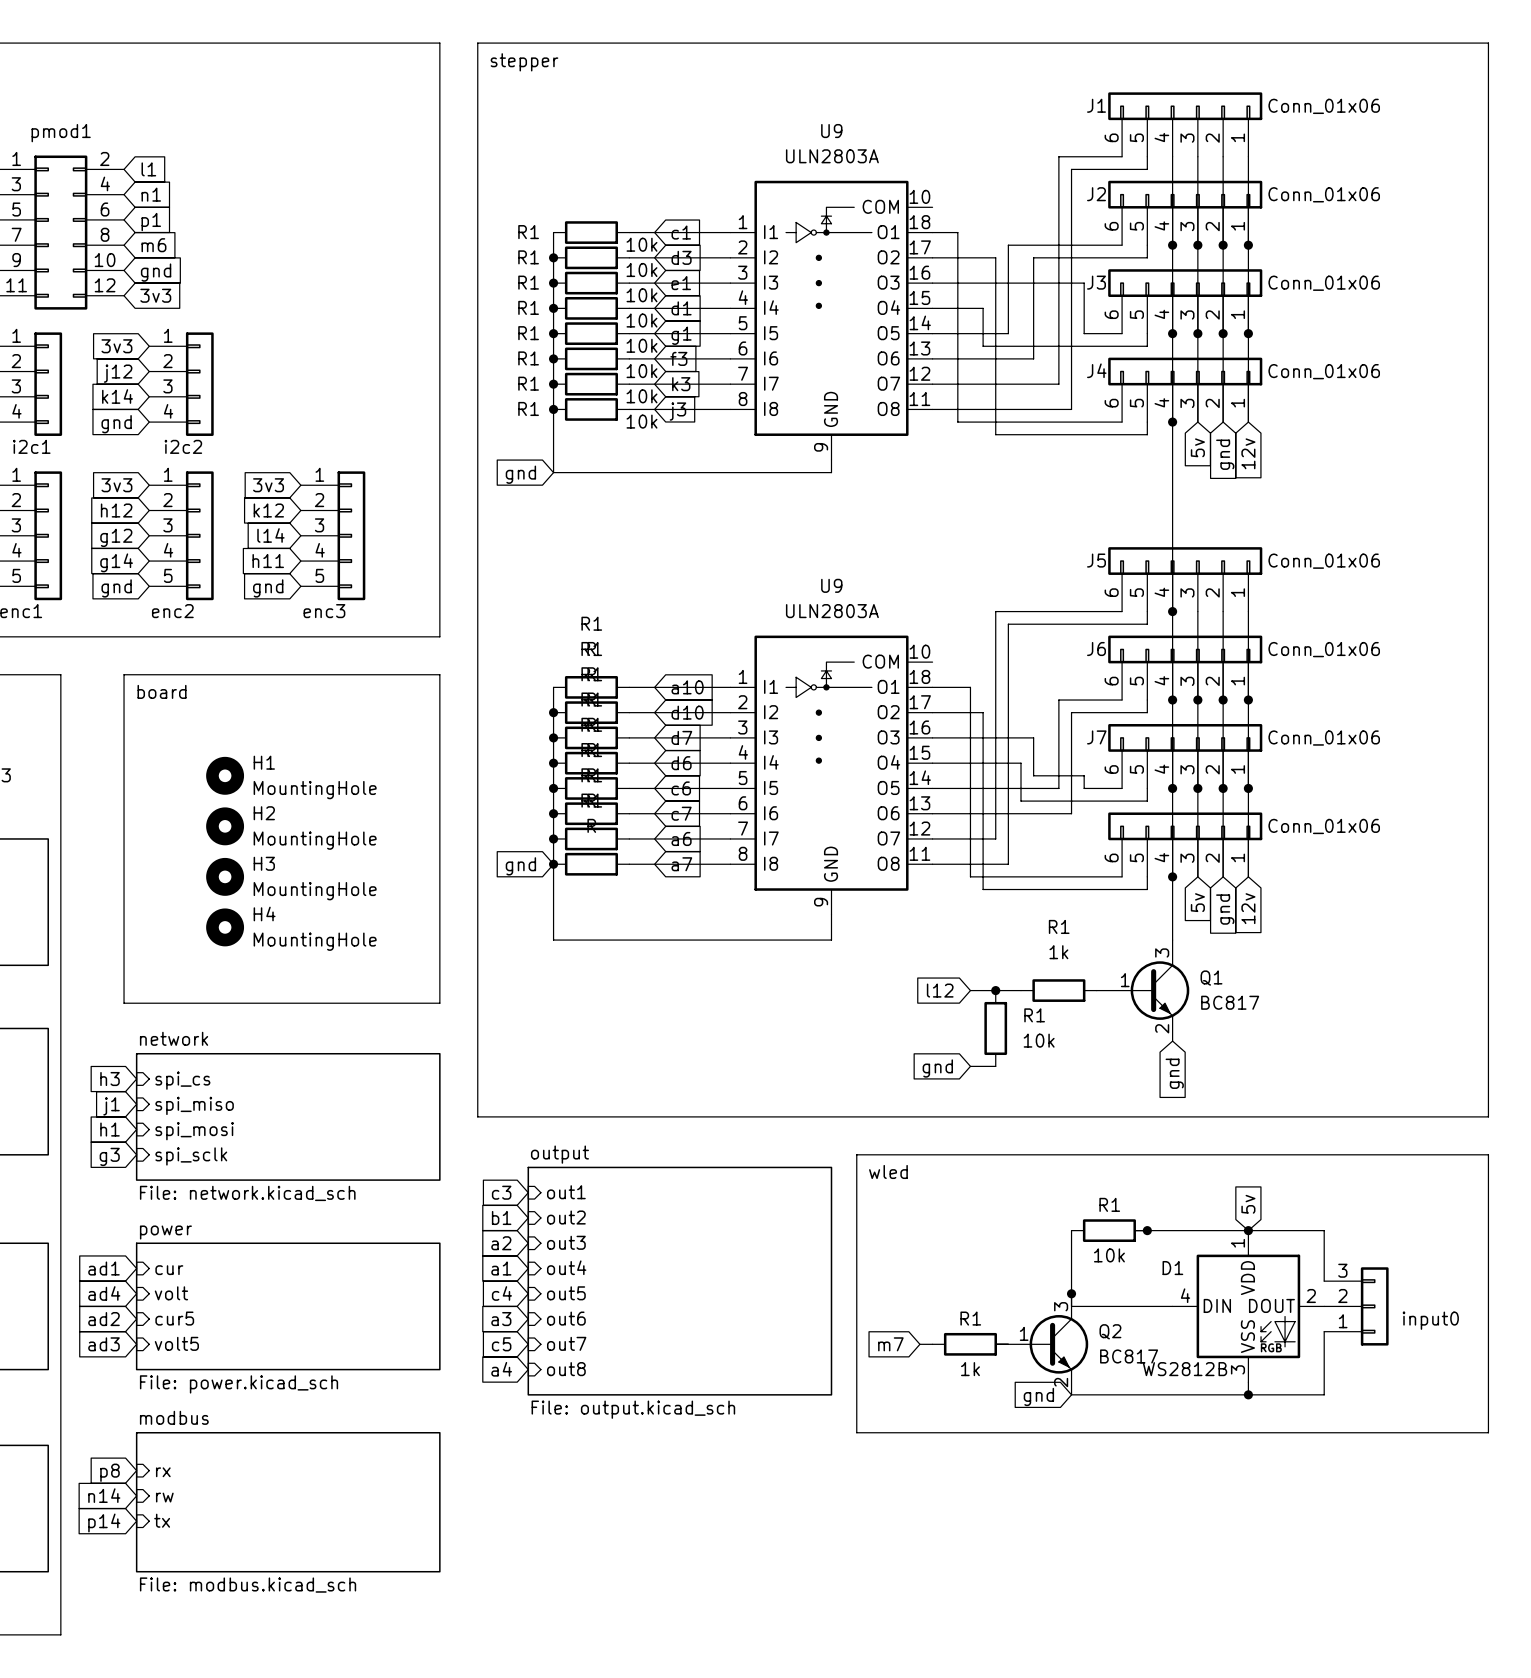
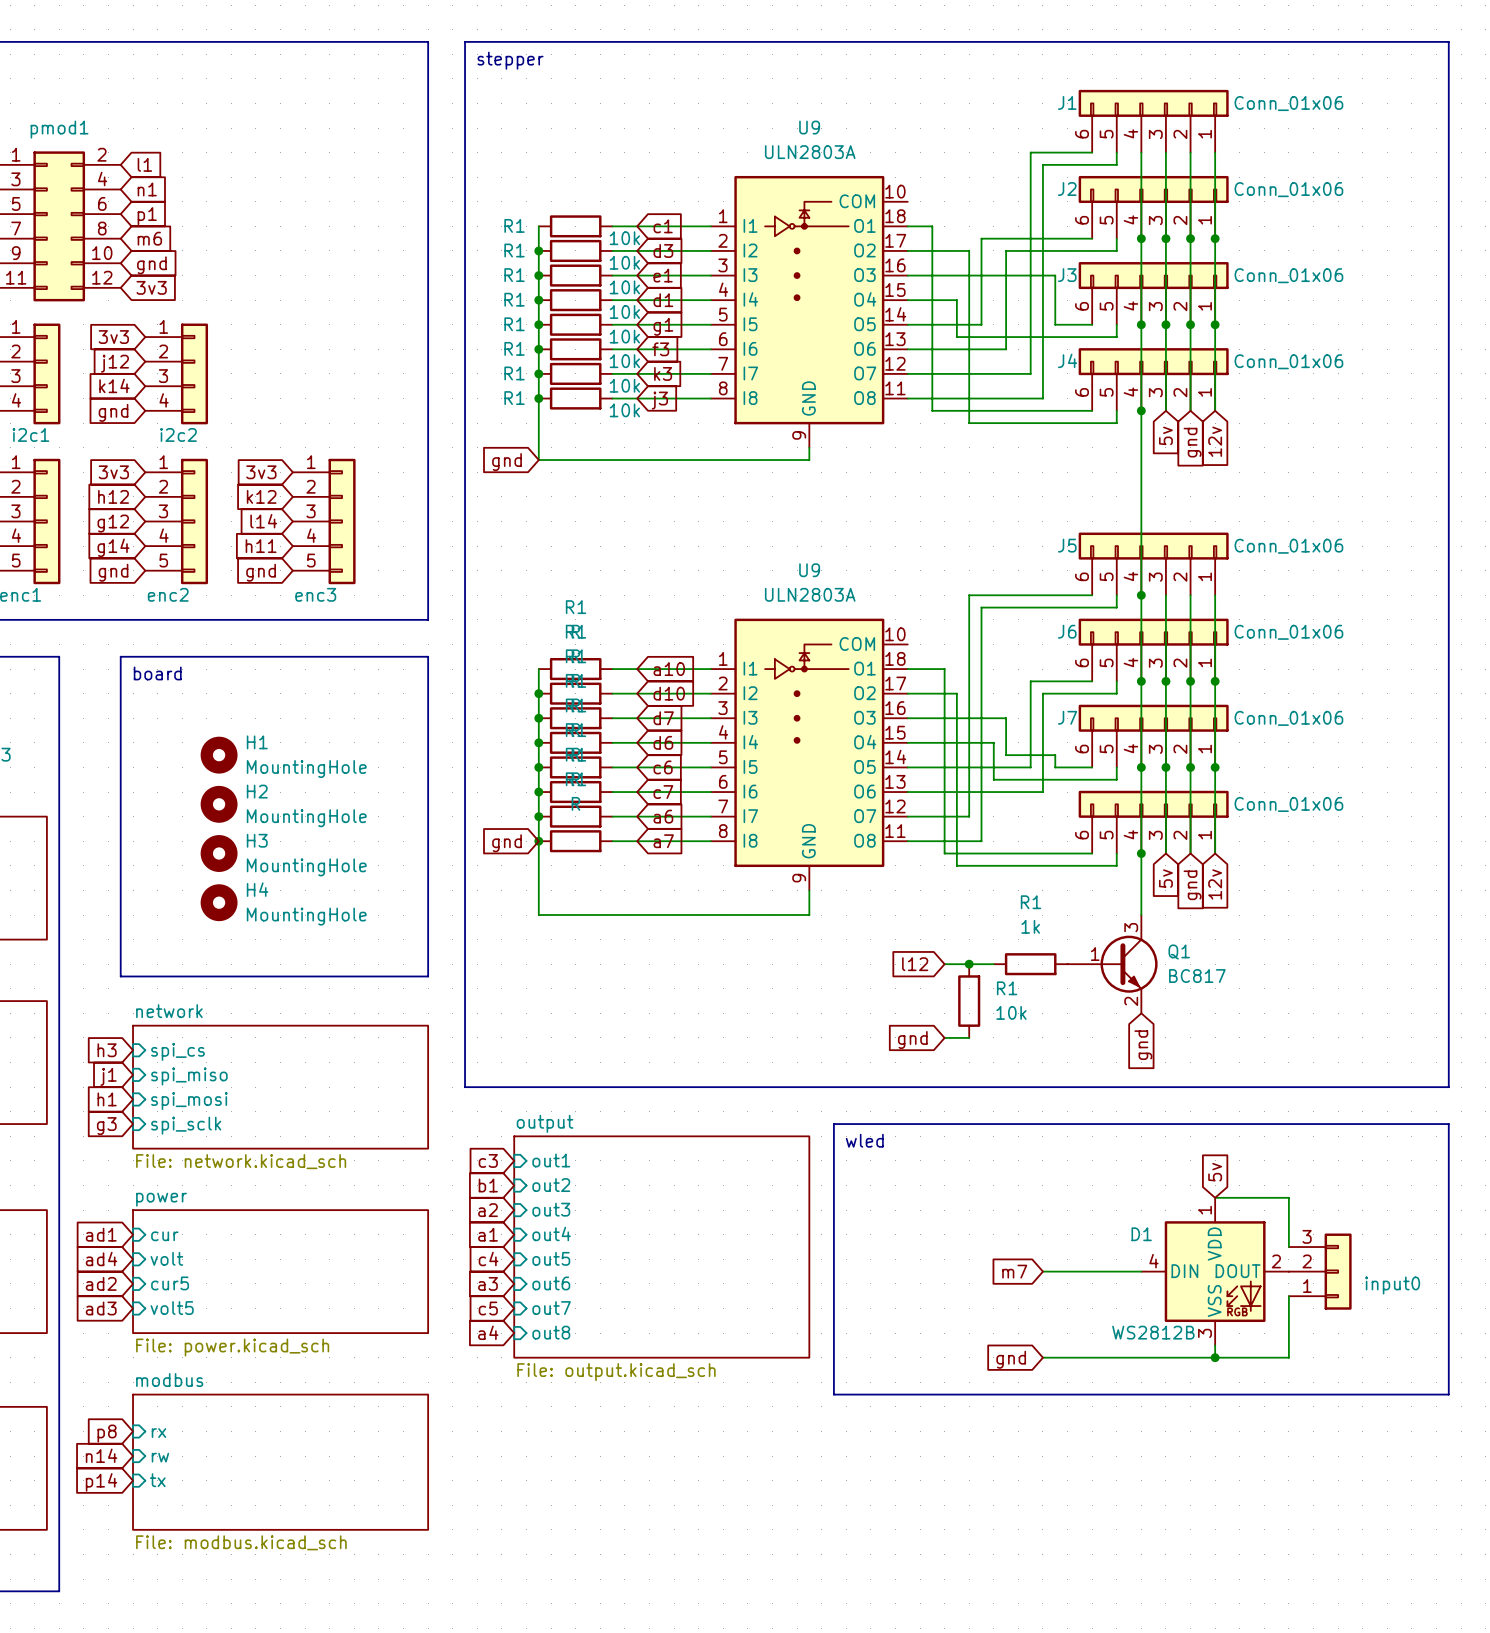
wire: (1071, 1230) (1071, 1306) -> none
R1: 10k (1109, 1230) -> none
wire: (1134, 1230) (1248, 1230) -> none
junction: (1147, 1230) -> none
junction: (1248, 1230) -> none
junction: (1071, 1293) -> none
global label position: m7 (890, 1344) -> m7 (1014, 1271)
wire: (919, 1344) (932, 1344) -> none
R1: 1k (970, 1344) -> none
Q2: BC817 (1041, 1344) -> none

